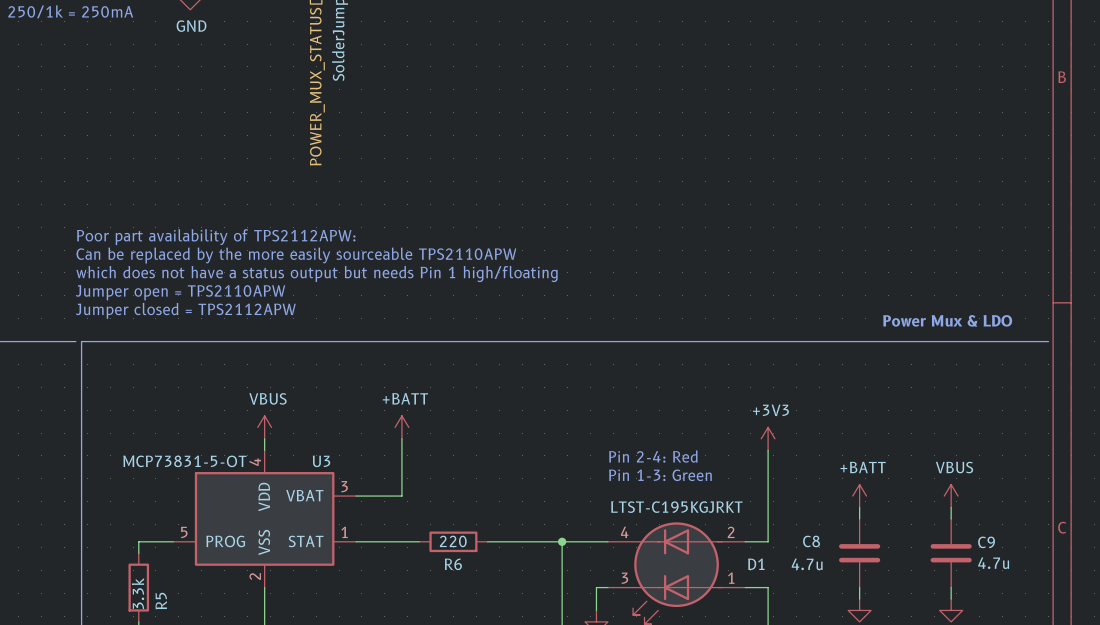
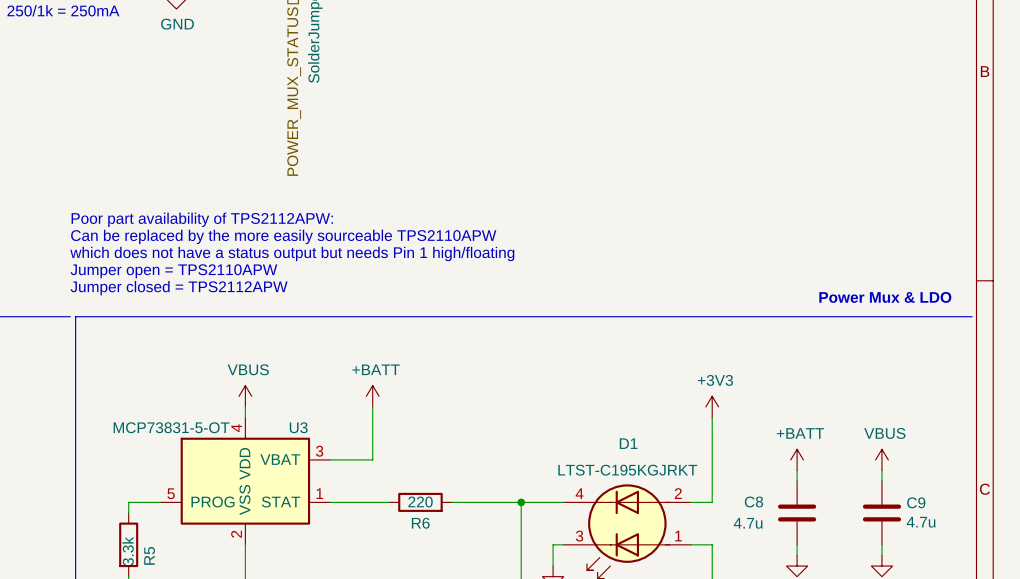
text: Pin 2-4: Red (653, 456) -> none
text: Pin 1-3: Green (660, 475) -> none
D1 name position: D1 (756, 564) -> D1 (628, 443)

